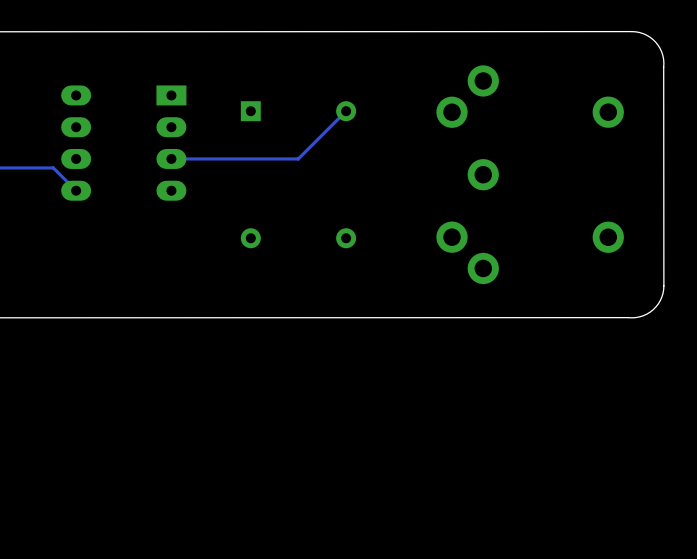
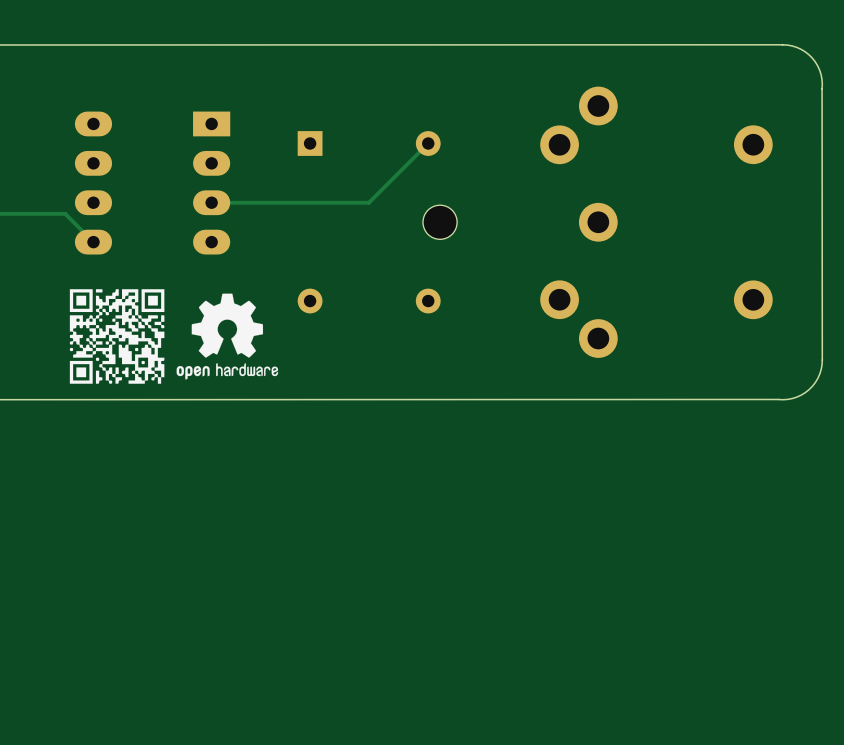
part: none -> (440, 222)
drawing: none -> [69, 289, 279, 384]

